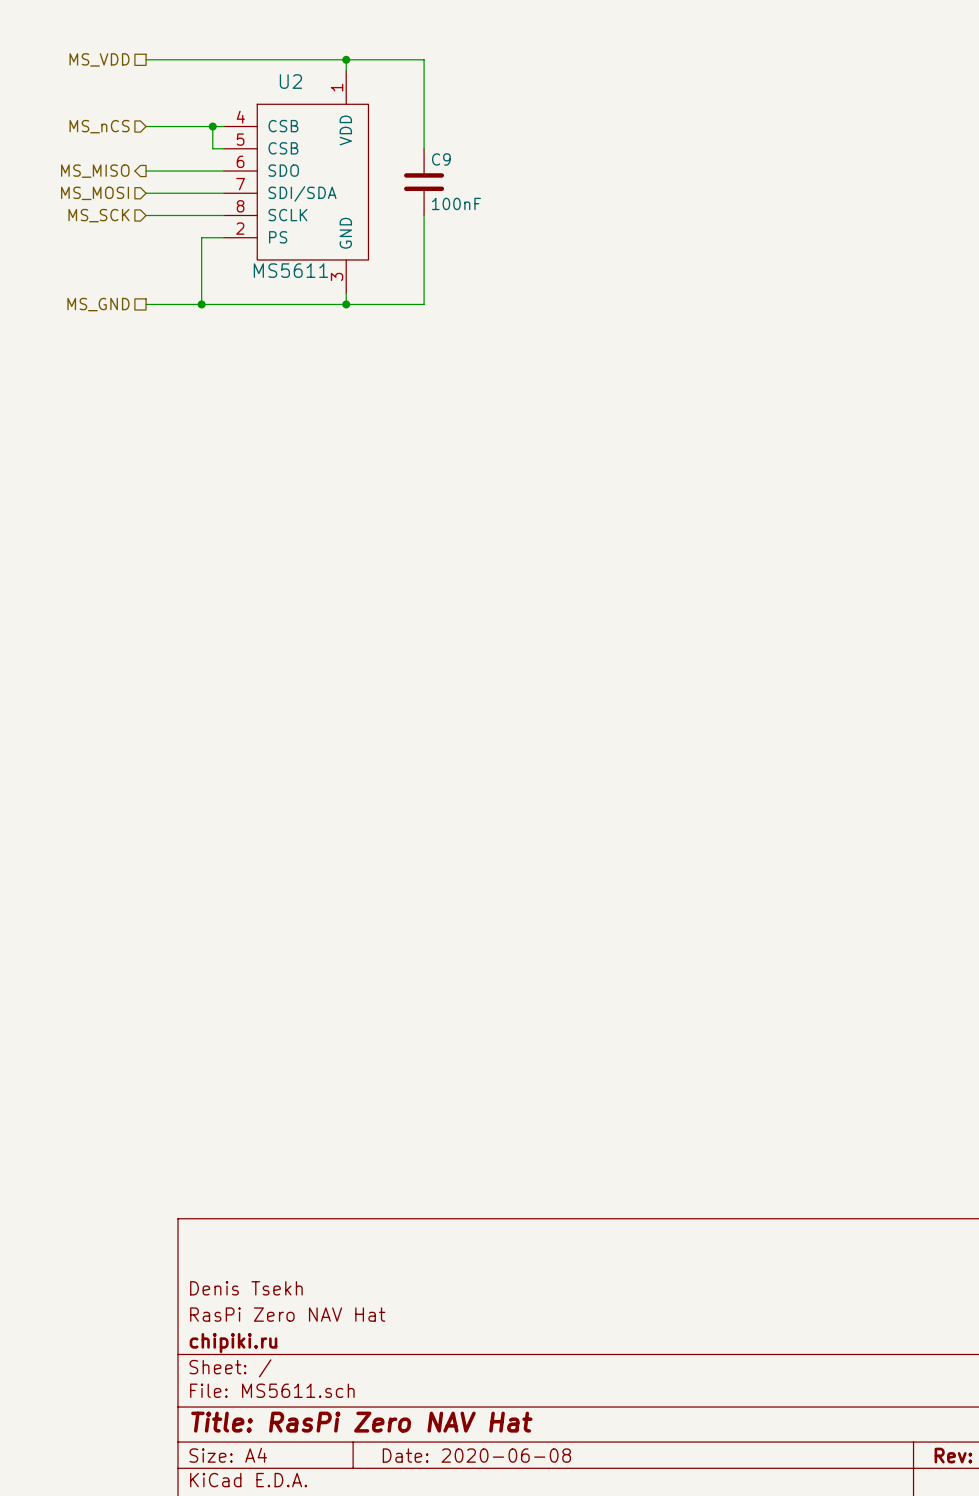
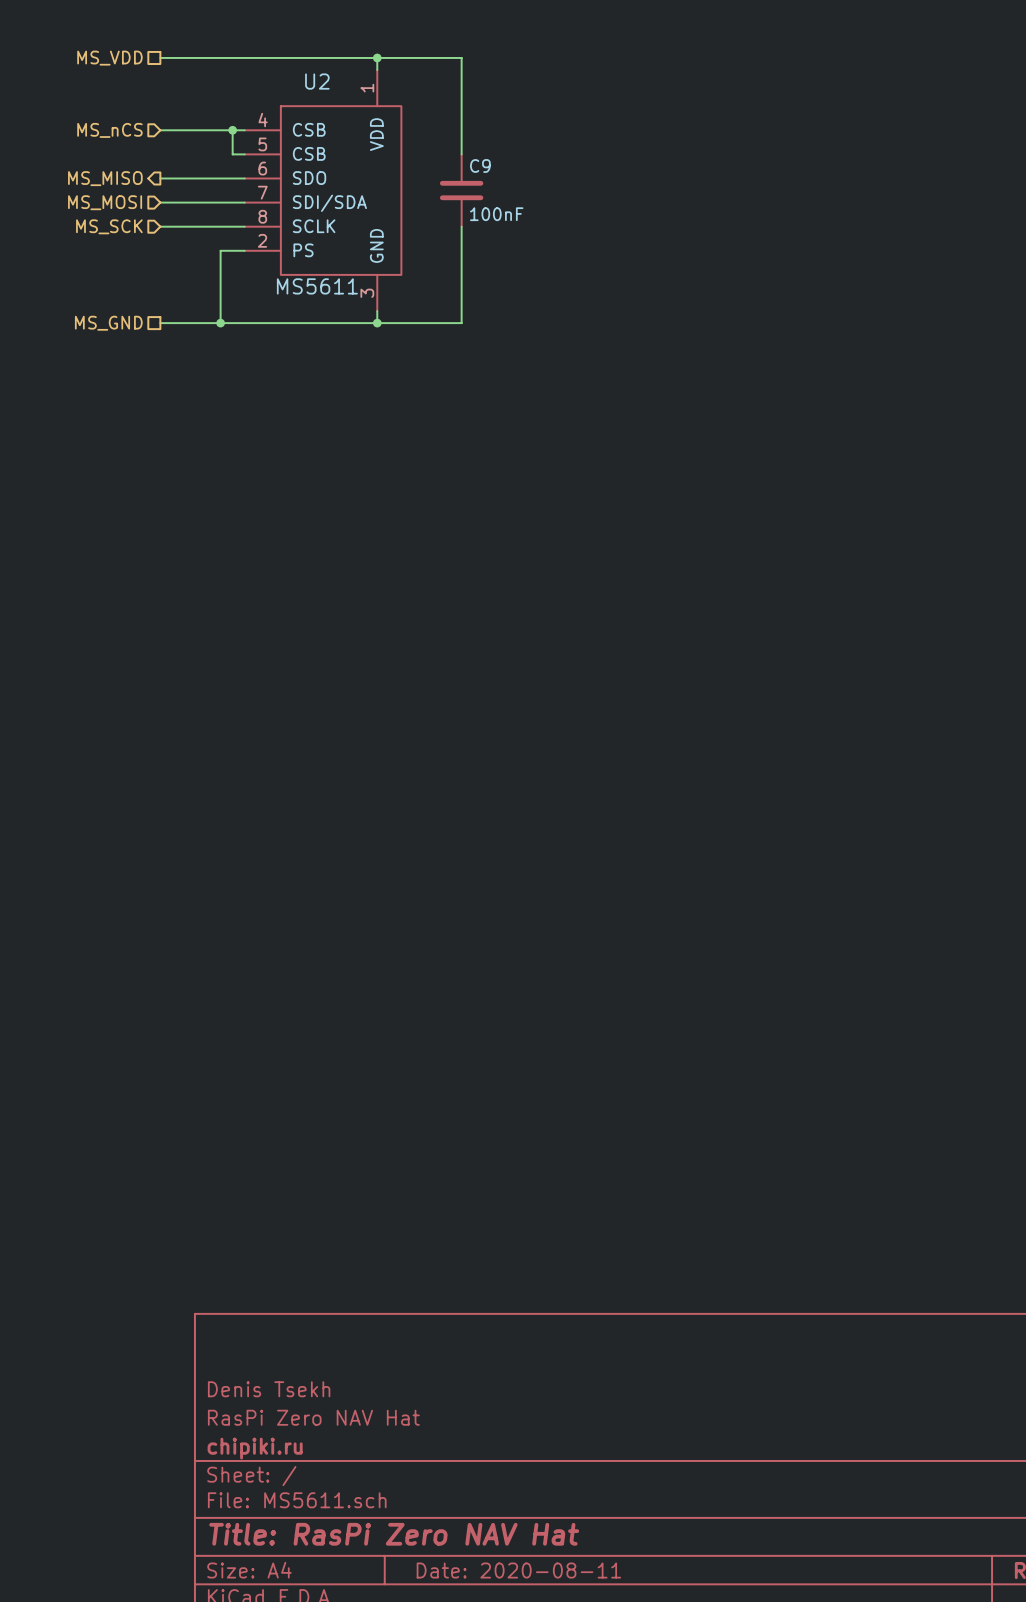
title block: Date: 2020-06-08 (476, 1455) -> Date: 2020-08-11 (518, 1570)

